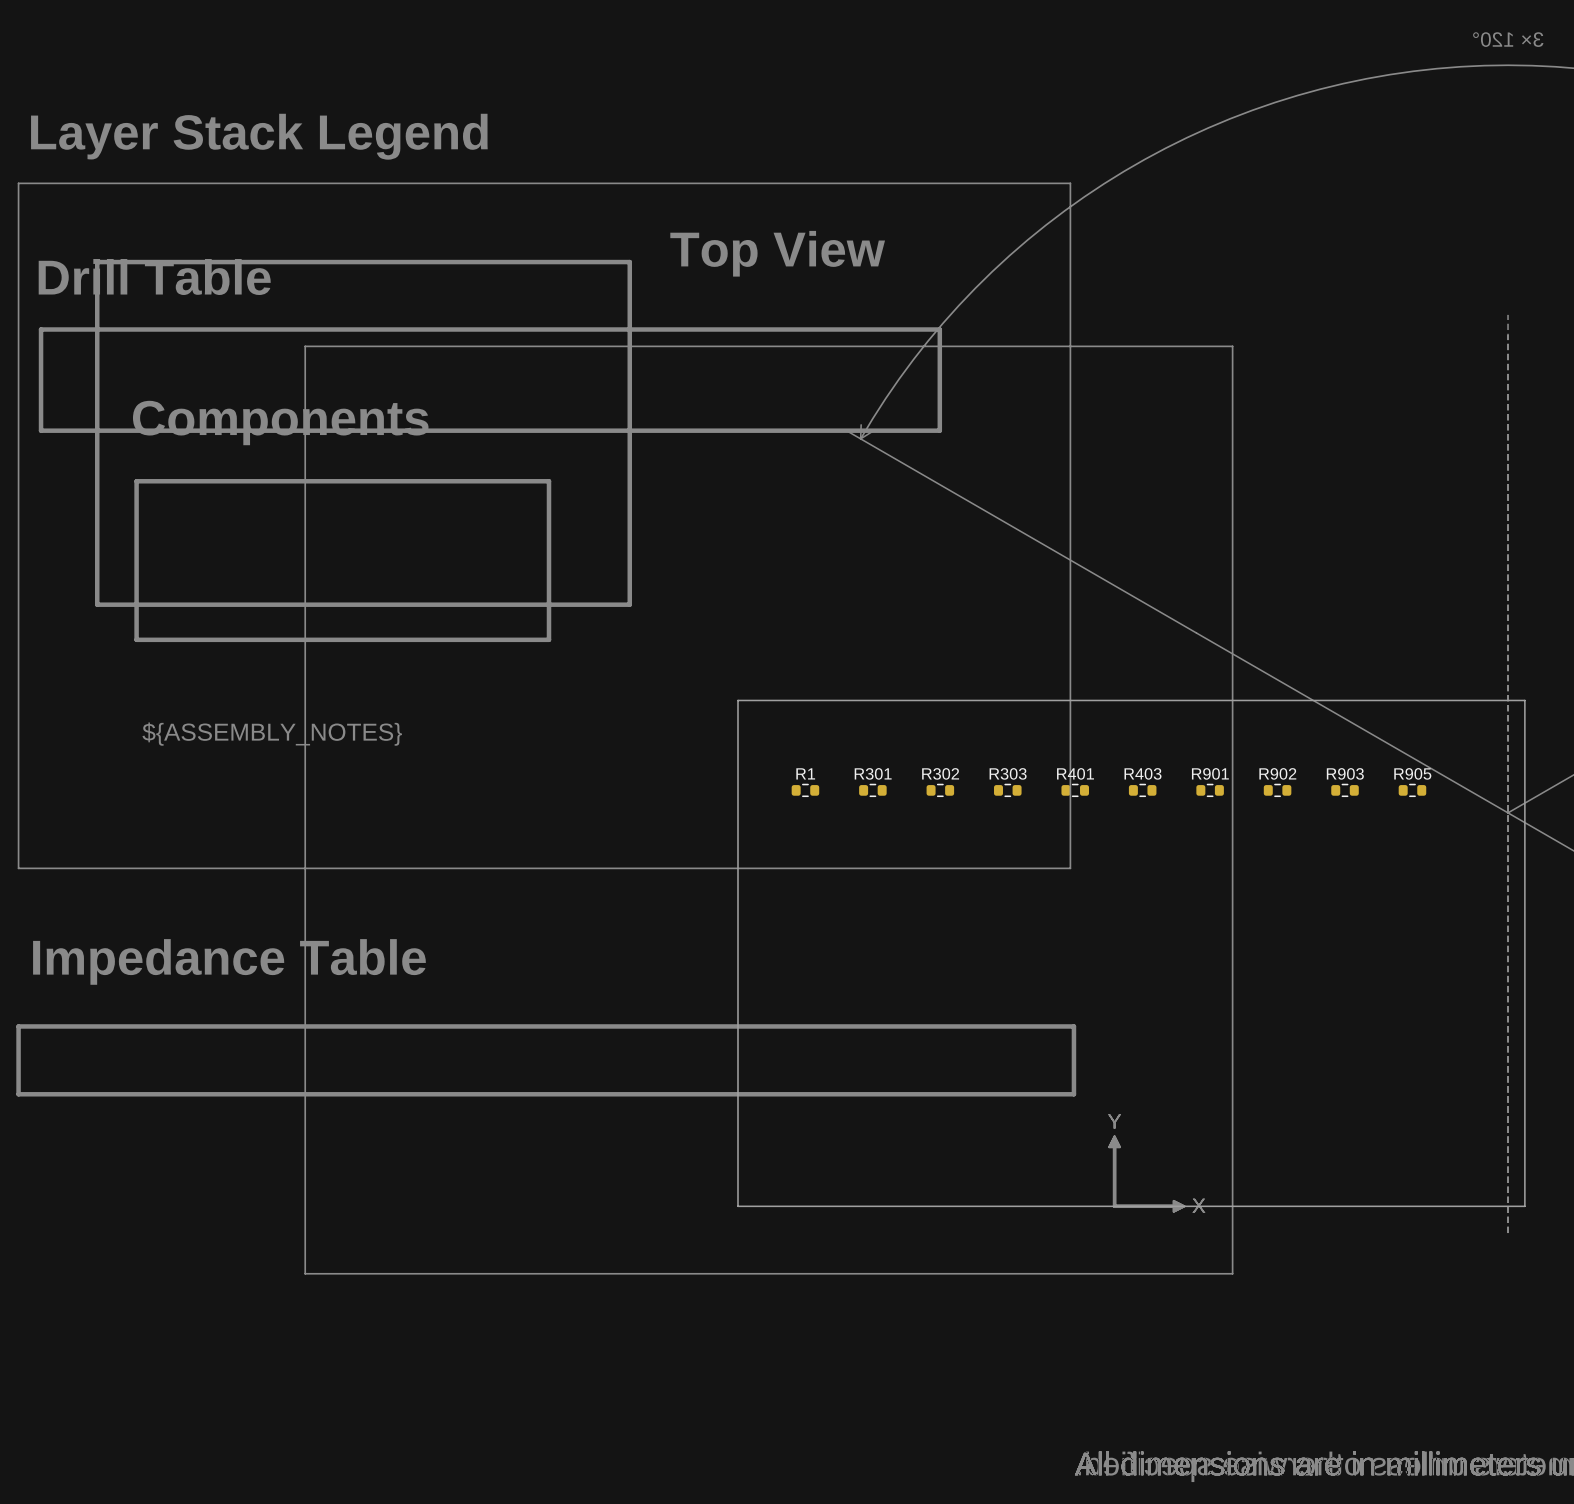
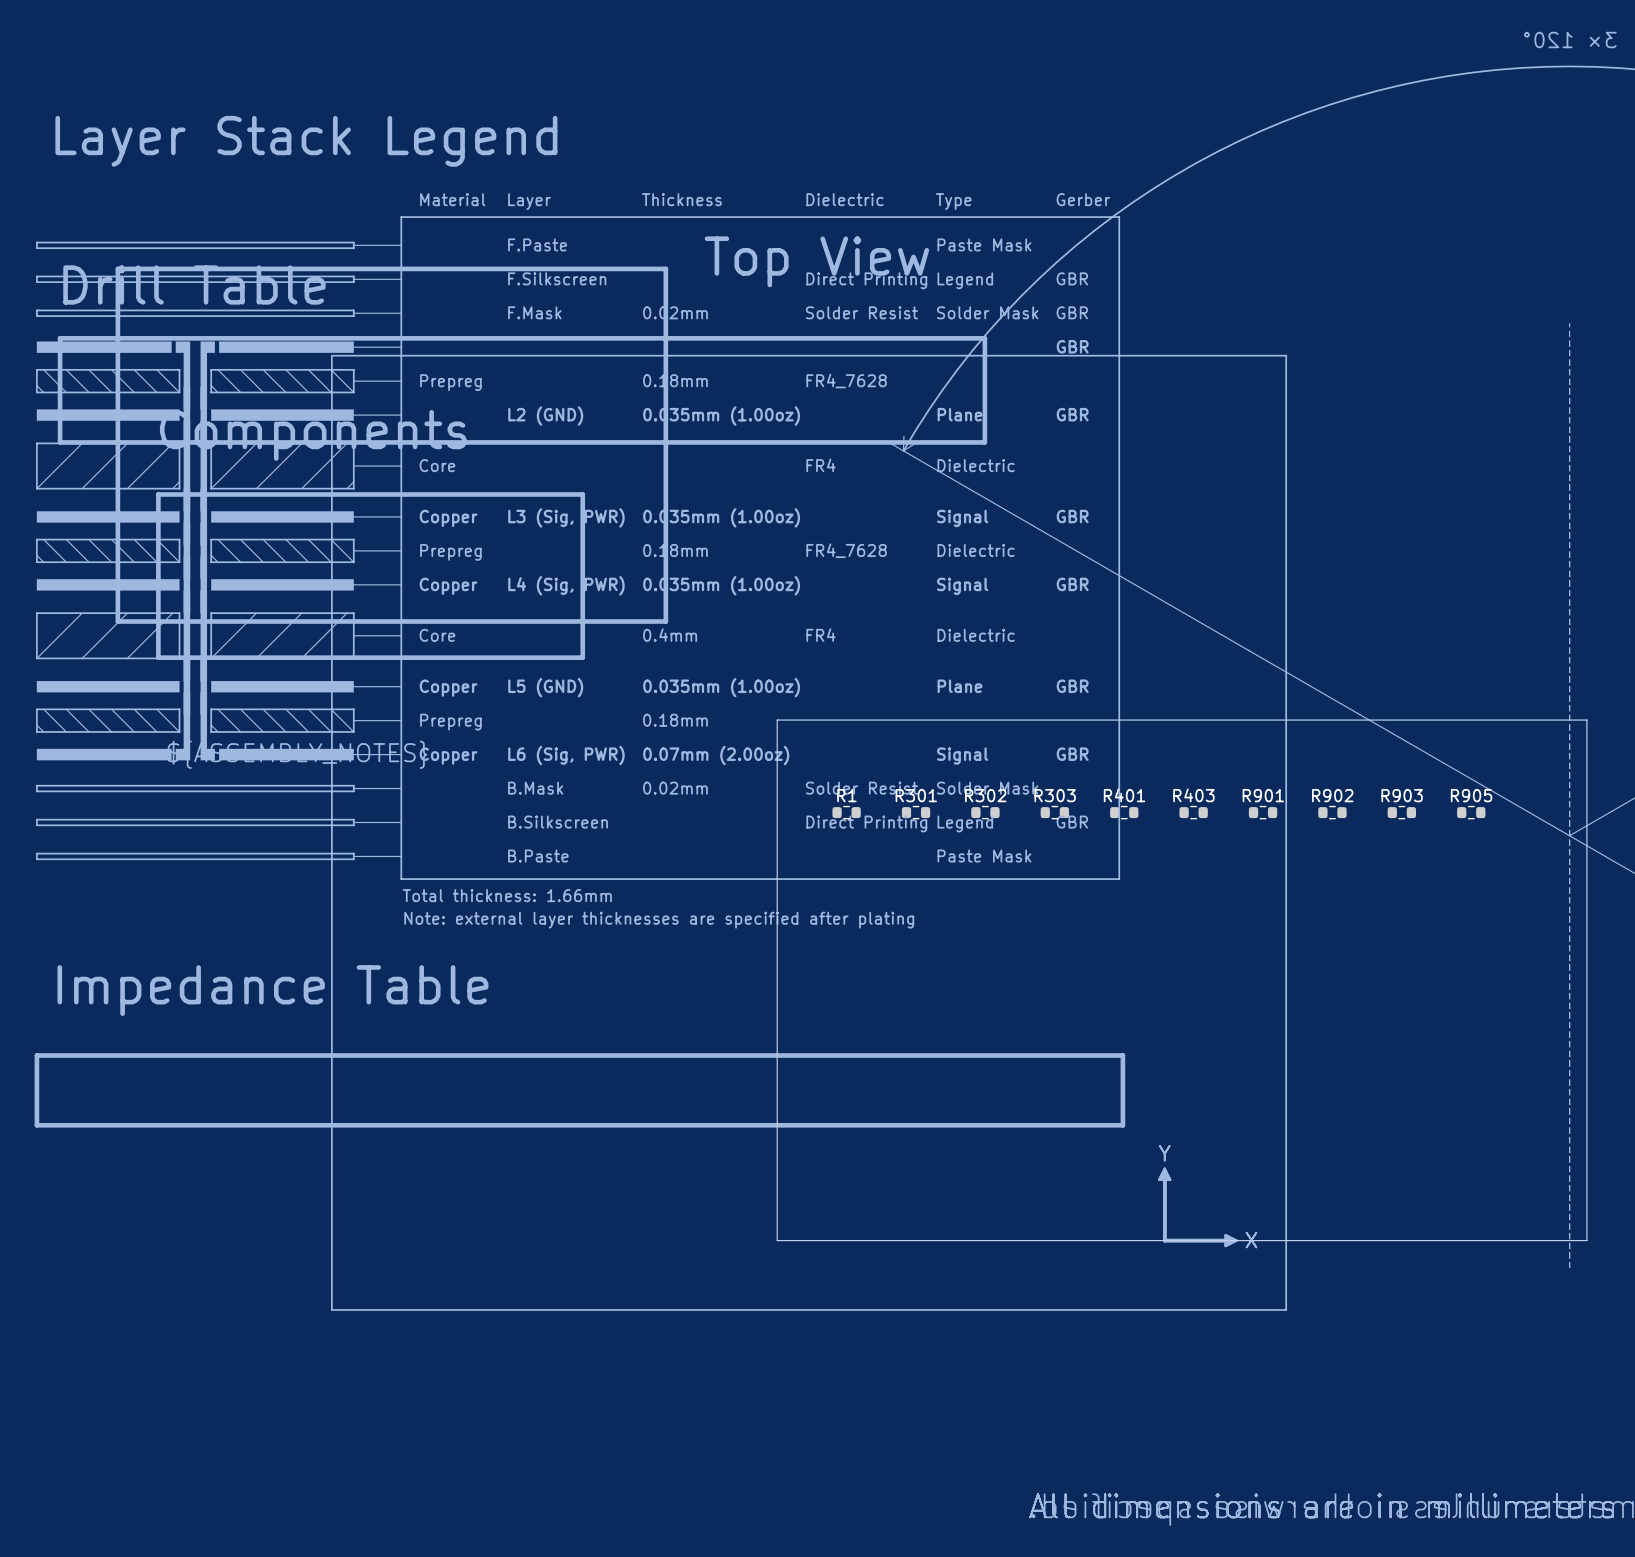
text: none -> Material (452, 199)
text: none -> Thickness (681, 199)
text: none -> Dielectric (845, 199)
text: none -> Gerber (1083, 199)
text: none -> Layer (529, 201)
text: none -> Type (953, 201)
line: (1070, 211) (1070, 183) (18, 183) (18, 236) -> (36, 248) (353, 248) (353, 242) (36, 242)
text: none -> F.Paste (537, 244)
text: none -> Paste Mask (984, 244)
line: none -> (353, 245) (401, 245)
line: (18, 241) (18, 269) -> (36, 282) (353, 282) (353, 276) (36, 276)
text: none -> F.Silkscreen (557, 278)
text: none -> GBR (1072, 278)
line: none -> (353, 279) (401, 279)
text: none -> Direct Printing (866, 280)
text: none -> Legend (965, 280)
line: (18, 274) (18, 302) -> (36, 316) (353, 316) (353, 310) (36, 310)
text: none -> F.Mask (534, 312)
text: none -> 0.02mm (675, 312)
text: none -> Solder Resist (861, 312)
text: none -> Solder Mask (987, 312)
text: none -> GBR (1072, 312)
line: none -> (353, 313) (401, 313)
line: (18, 307) (18, 360) -> (179, 392) (179, 369) (36, 369)
drawing: none -> [36, 341, 354, 761]
text: none -> GBR (1072, 346)
line: none -> (353, 347) (401, 347)
line: none -> (43, 369) (66, 392)
line: none -> (66, 369) (88, 392)
line: none -> (88, 369) (111, 392)
line: none -> (111, 369) (134, 392)
line: none -> (134, 369) (156, 392)
line: none -> (156, 369) (179, 392)
line: none -> (217, 369) (240, 392)
line: none -> (240, 369) (263, 392)
line: none -> (263, 369) (285, 392)
line: none -> (285, 369) (308, 392)
line: none -> (308, 369) (331, 392)
line: none -> (331, 369) (353, 392)
text: none -> 0.18mm (675, 380)
line: none -> (353, 381) (401, 381)
text: none -> Prepreg (450, 382)
text: none -> FR4_7628 (846, 381)
line: none -> (36, 385) (43, 392)
line: none -> (211, 385) (217, 392)
line: (18, 382) (18, 431) -> (82, 443) (36, 488) (179, 488) (179, 443) (36, 443)
line: none -> (36, 392) (179, 392)
line: none -> (353, 392) (353, 369) (211, 369) (211, 392) (353, 392)
text: none -> Plane (959, 414)
text: none -> GBR (1072, 414)
line: none -> (353, 415) (401, 415)
text: none -> L2 (GND) (545, 416)
text: none -> 0.035mm (1.00oz) (721, 416)
line: none -> (127, 443) (82, 488)
line: none -> (172, 443) (127, 488)
line: none -> (256, 443) (211, 488)
line: none -> (301, 443) (256, 488)
line: none -> (346, 443) (301, 488)
text: none -> Dielectric (976, 465)
line: none -> (353, 466) (401, 466)
text: none -> Core (437, 465)
text: none -> FR4 (821, 465)
line: none -> (179, 481) (172, 488)
line: none -> (353, 481) (346, 488)
line: (18, 475) (18, 525) -> (179, 562) (179, 539) (36, 539)
line: none -> (211, 488) (211, 443) (353, 443) (353, 488) (211, 488)
text: none -> GBR (1072, 516)
line: none -> (353, 516) (401, 516)
text: none -> Copper (448, 518)
text: none -> L3 (Sig, PWR) (566, 517)
text: none -> 0.035mm (1.00oz) (721, 517)
text: none -> Signal (962, 518)
line: none -> (43, 539) (66, 562)
line: none -> (66, 539) (88, 562)
line: none -> (88, 539) (111, 562)
line: none -> (111, 539) (134, 562)
line: none -> (134, 539) (156, 562)
line: none -> (156, 539) (179, 562)
line: none -> (217, 539) (240, 562)
line: none -> (240, 539) (263, 562)
line: none -> (263, 539) (285, 562)
line: none -> (285, 539) (308, 562)
line: none -> (308, 539) (331, 562)
line: none -> (331, 539) (353, 562)
text: none -> 0.18mm (675, 550)
text: none -> Dielectric (976, 550)
line: none -> (353, 550) (401, 550)
text: none -> Prepreg (450, 552)
text: none -> FR4_7628 (846, 550)
line: none -> (36, 555) (43, 562)
line: none -> (211, 555) (217, 562)
line: (18, 547) (18, 596) -> (82, 613) (36, 658) (179, 658) (179, 613) (36, 613)
line: none -> (36, 562) (179, 562)
line: none -> (353, 562) (353, 539) (211, 539) (211, 562) (353, 562)
text: none -> GBR (1072, 584)
line: none -> (353, 584) (401, 584)
text: none -> Copper (448, 586)
text: none -> L4 (Sig, PWR) (566, 585)
text: none -> 0.035mm (1.00oz) (721, 585)
text: none -> Signal (962, 586)
line: none -> (127, 613) (82, 658)
line: none -> (172, 613) (127, 658)
line: none -> (256, 613) (211, 658)
line: none -> (301, 613) (256, 658)
line: none -> (346, 613) (301, 658)
text: none -> Dielectric (976, 635)
line: none -> (353, 635) (401, 635)
text: none -> Core (437, 635)
text: none -> 0.4mm (670, 635)
text: none -> FR4 (821, 635)
line: (18, 640) (18, 690) -> (179, 731) (179, 709) (36, 709)
line: none -> (211, 658) (211, 613) (353, 613) (353, 658) (211, 658)
text: none -> Plane (959, 686)
text: none -> GBR (1072, 686)
line: none -> (353, 686) (401, 686)
text: none -> Copper (448, 688)
text: none -> L5 (GND) (545, 687)
text: none -> 0.035mm (1.00oz) (721, 687)
line: none -> (43, 709) (66, 731)
line: none -> (66, 709) (88, 731)
line: none -> (88, 709) (111, 731)
line: none -> (111, 709) (134, 731)
line: none -> (134, 709) (156, 731)
line: none -> (156, 709) (179, 731)
line: none -> (217, 709) (240, 731)
line: none -> (240, 709) (263, 731)
line: none -> (263, 709) (285, 731)
line: none -> (285, 709) (308, 731)
line: none -> (308, 709) (331, 731)
line: none -> (331, 709) (353, 731)
text: none -> 0.18mm (675, 720)
line: none -> (353, 720) (401, 720)
text: none -> Prepreg (450, 722)
line: none -> (36, 725) (43, 731)
line: none -> (211, 725) (217, 731)
line: (18, 712) (18, 764) -> (36, 731) (179, 731)
line: none -> (353, 731) (353, 709) (211, 709) (211, 731) (353, 731)
text: none -> GBR (1072, 754)
line: none -> (353, 754) (401, 754)
text: none -> 0.07mm (2.00oz) (716, 755)
text: none -> Copper (448, 756)
text: none -> L6 (Sig, PWR) (566, 755)
text: none -> Signal (962, 756)
text: none -> B.Mask (535, 788)
text: none -> 0.02mm (675, 788)
text: none -> Solder Resist (861, 788)
text: none -> Solder Mask (987, 788)
line: none -> (353, 788) (401, 788)
line: (18, 769) (18, 797) -> (36, 791) (353, 791) (353, 785) (36, 785)
line: none -> (36, 819) (353, 819) (353, 825) (36, 825)
text: none -> B.Silkscreen (558, 822)
text: none -> GBR (1072, 822)
line: none -> (353, 822) (401, 822)
text: none -> Direct Printing (866, 823)
text: none -> Legend (965, 823)
line: (18, 802) (18, 830) -> (36, 859) (353, 859) (353, 853) (36, 853)
text: none -> B.Paste (538, 856)
text: none -> Paste Mask (984, 856)
line: none -> (353, 856) (401, 856)
line: (18, 835) (18, 868) (1070, 868) (1070, 855) -> (1119, 217) (401, 217) (401, 879) (1119, 879)
text: none -> Total thickness: 1.66mm (507, 895)
text: none -> Note: external layer thicknesses are specified after plating (659, 920)

